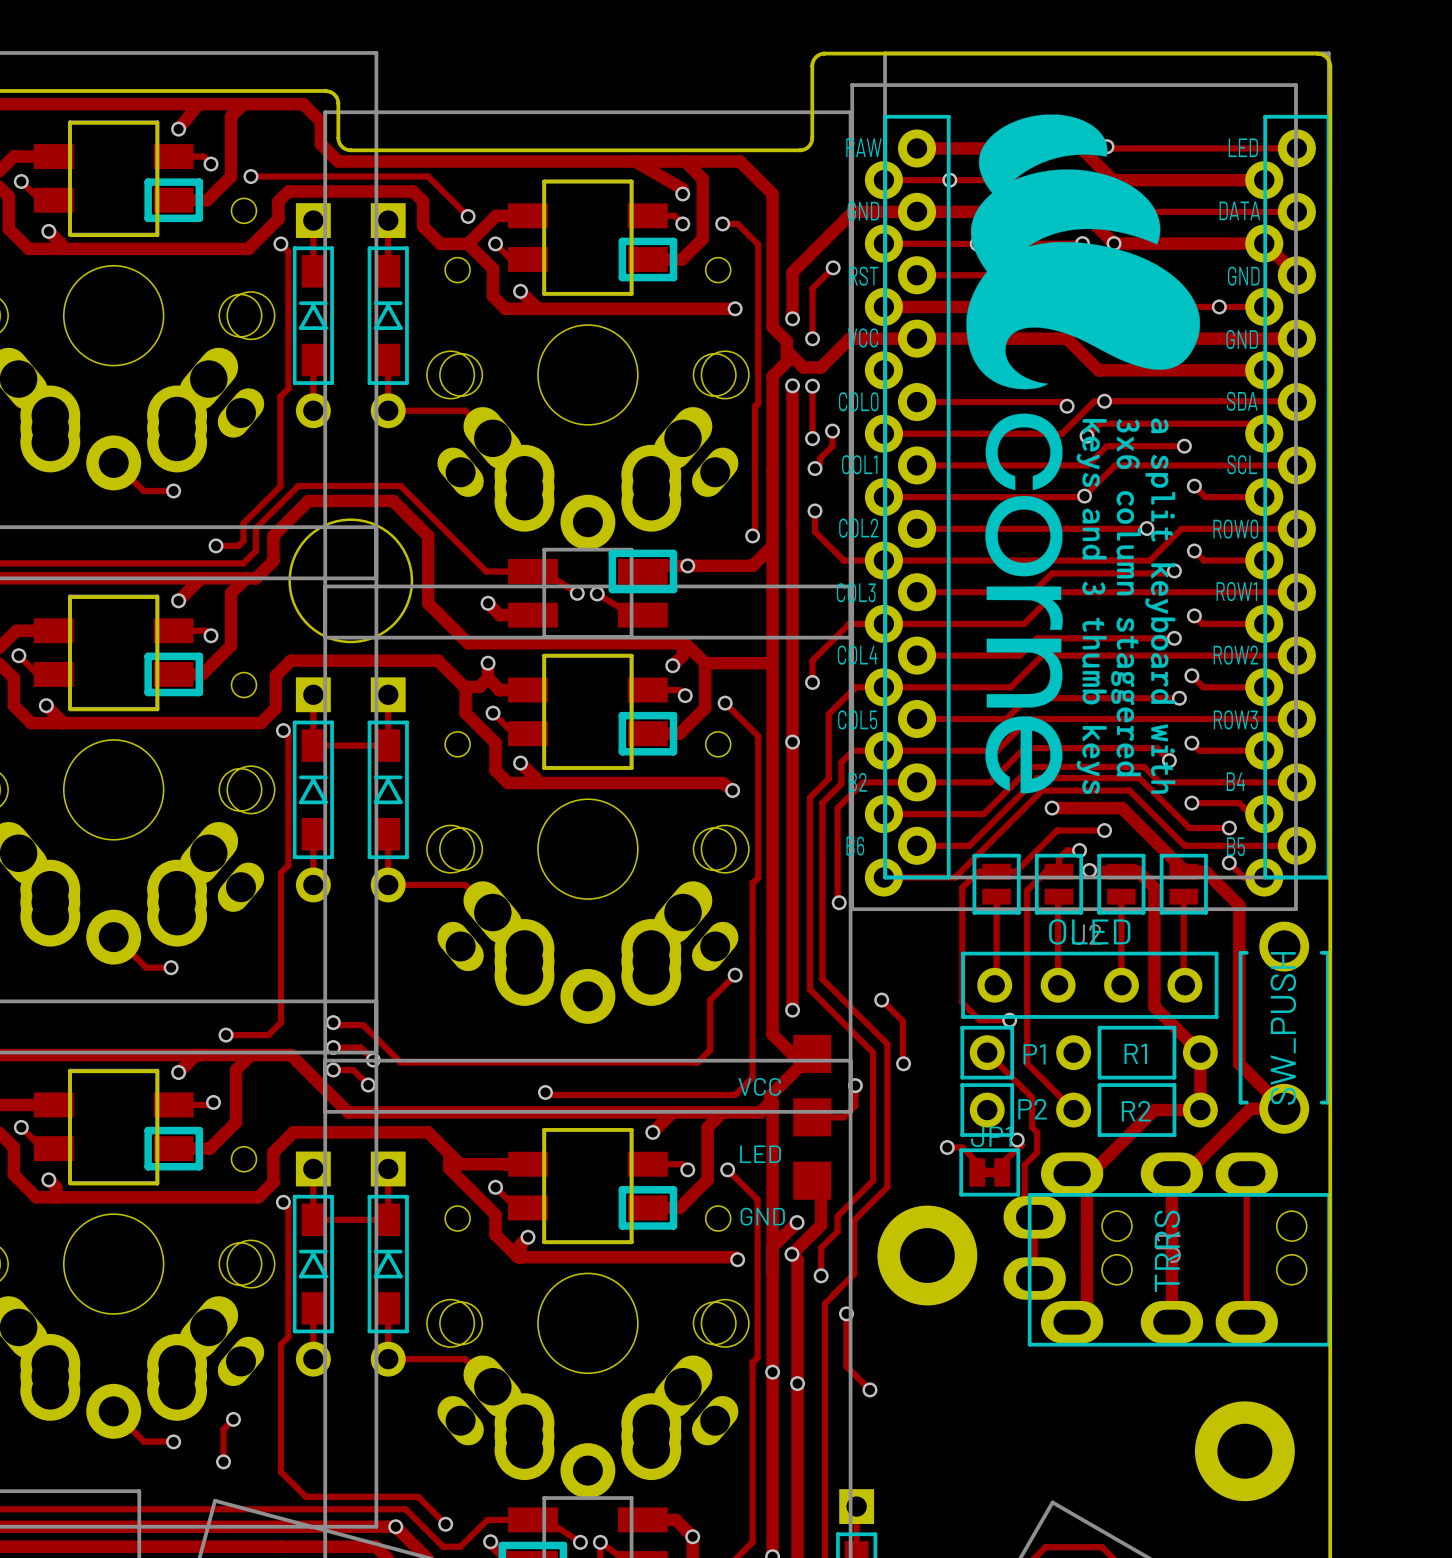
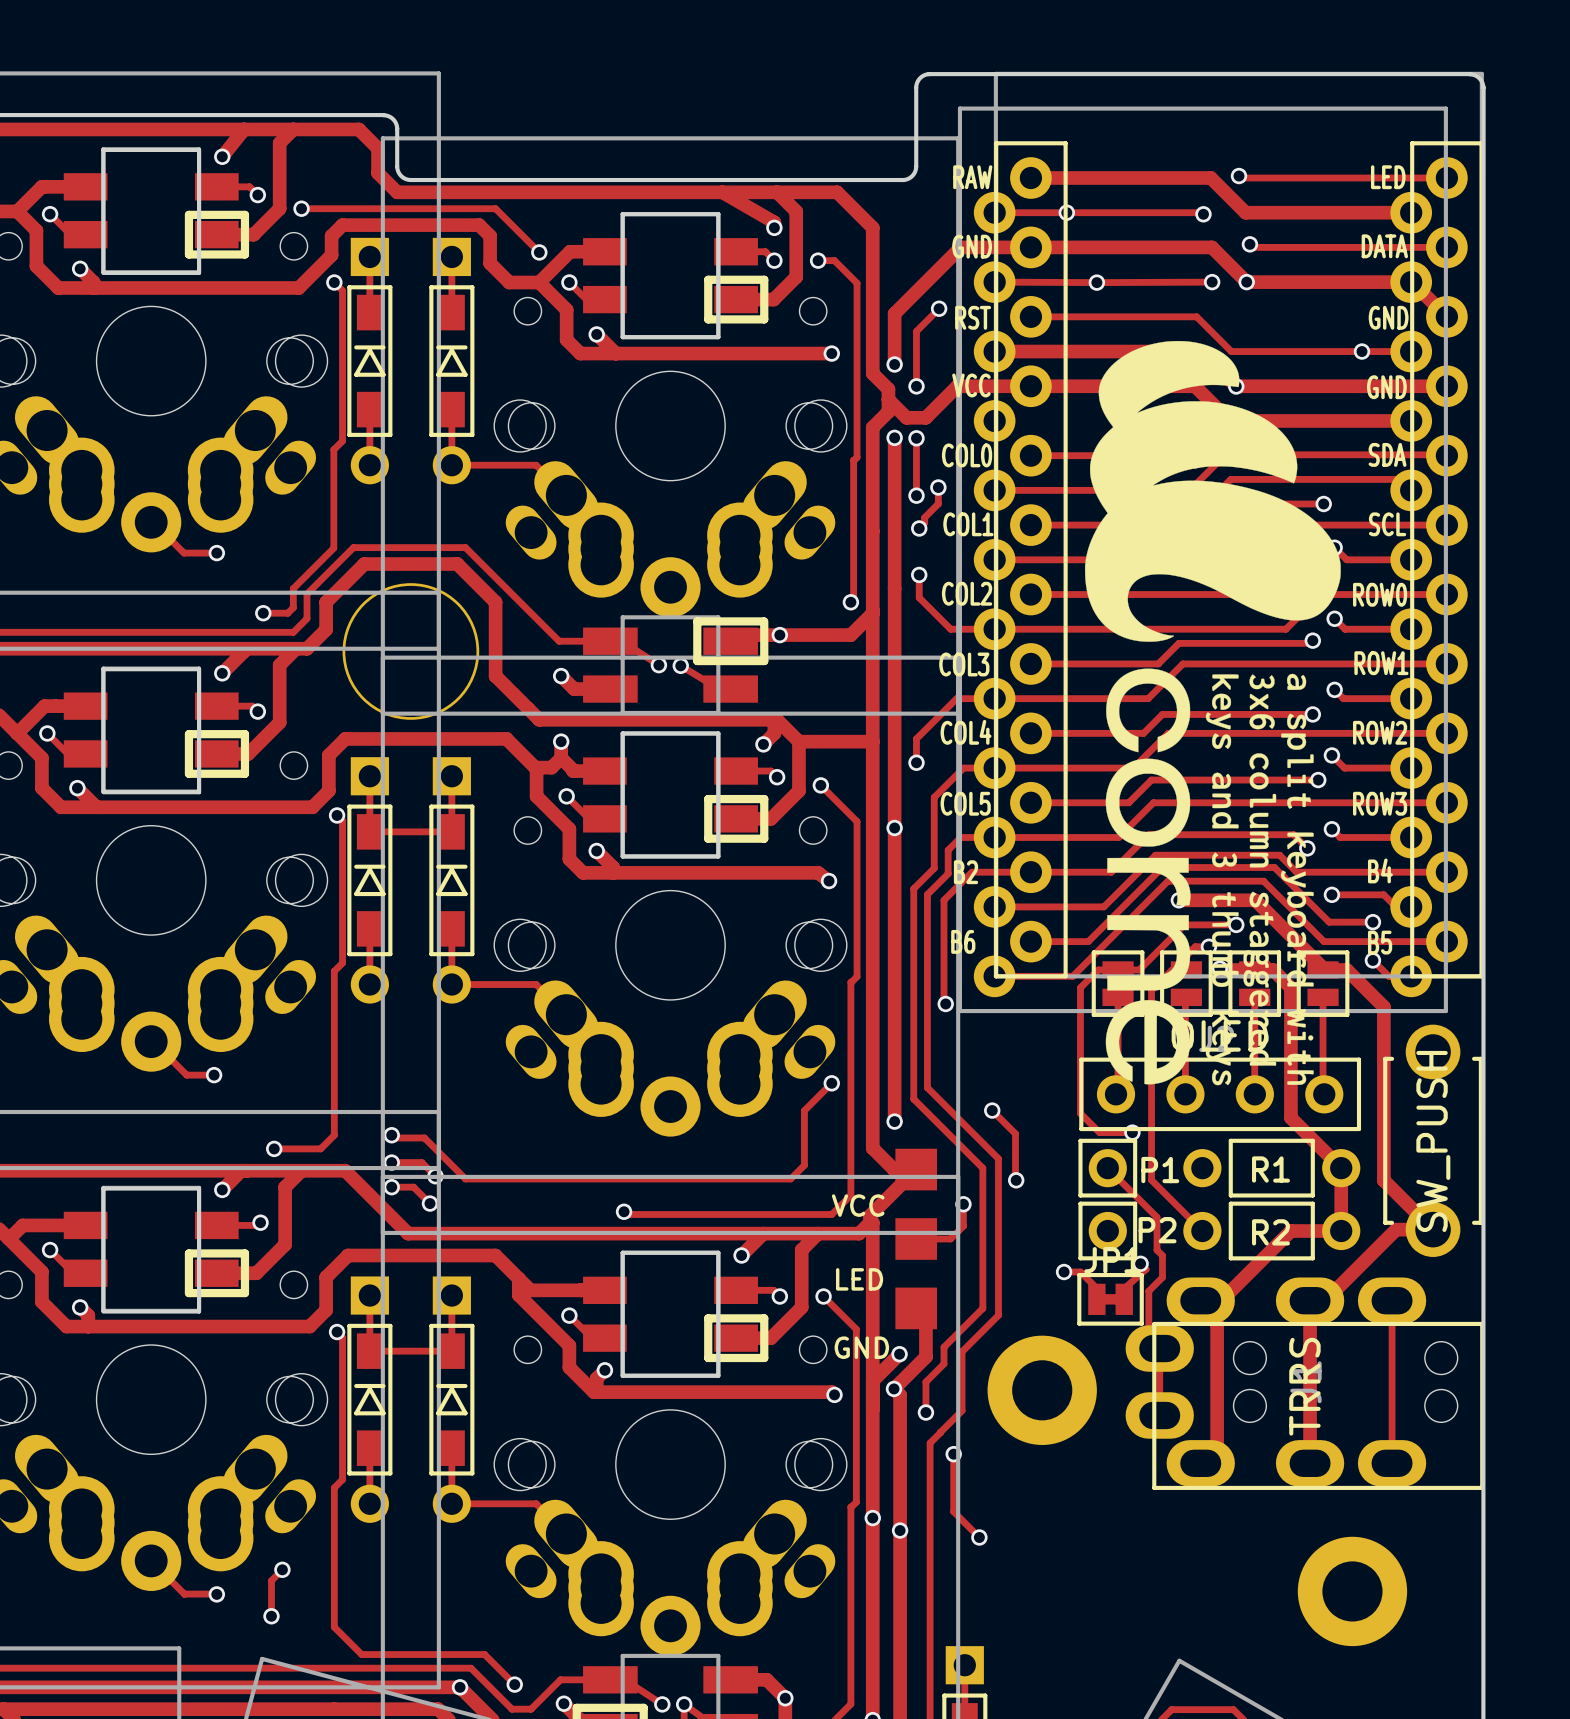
drawing position: (1083, 454) -> (1212, 713)
part position: (1244, 1451) -> (1352, 1591)

